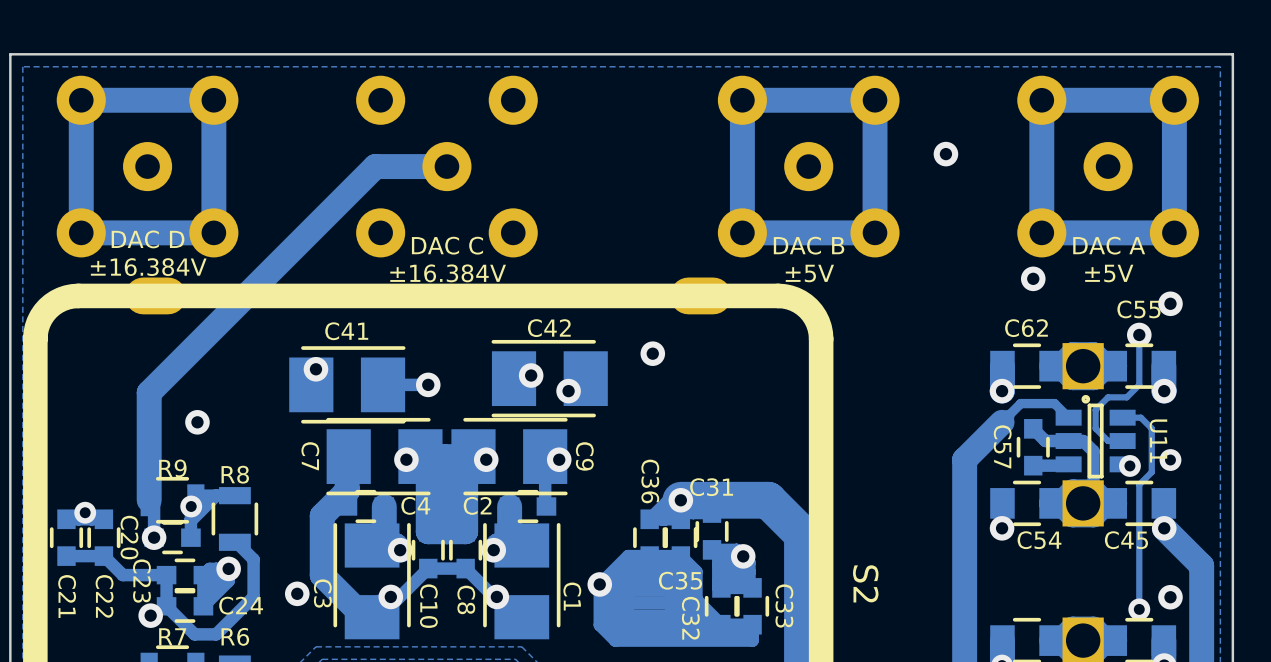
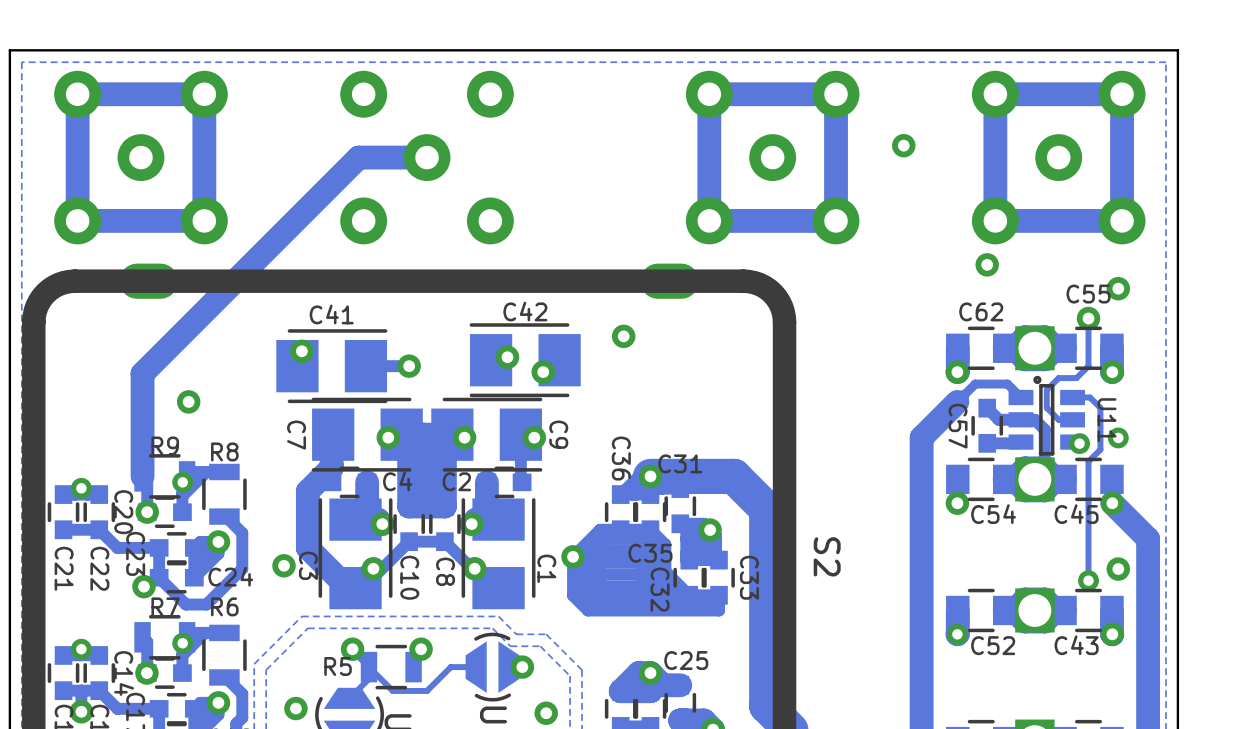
text: DAC D (148, 239) -> none
text: DAC C (447, 245) -> none
text: DAC B (809, 245) -> none
text: DAC A (1109, 245) -> none
text: ±16.384V (148, 267) -> none
text: ±16.384V (448, 273) -> none
text: ±5V (809, 273) -> none
text: ±5V (1109, 273) -> none

